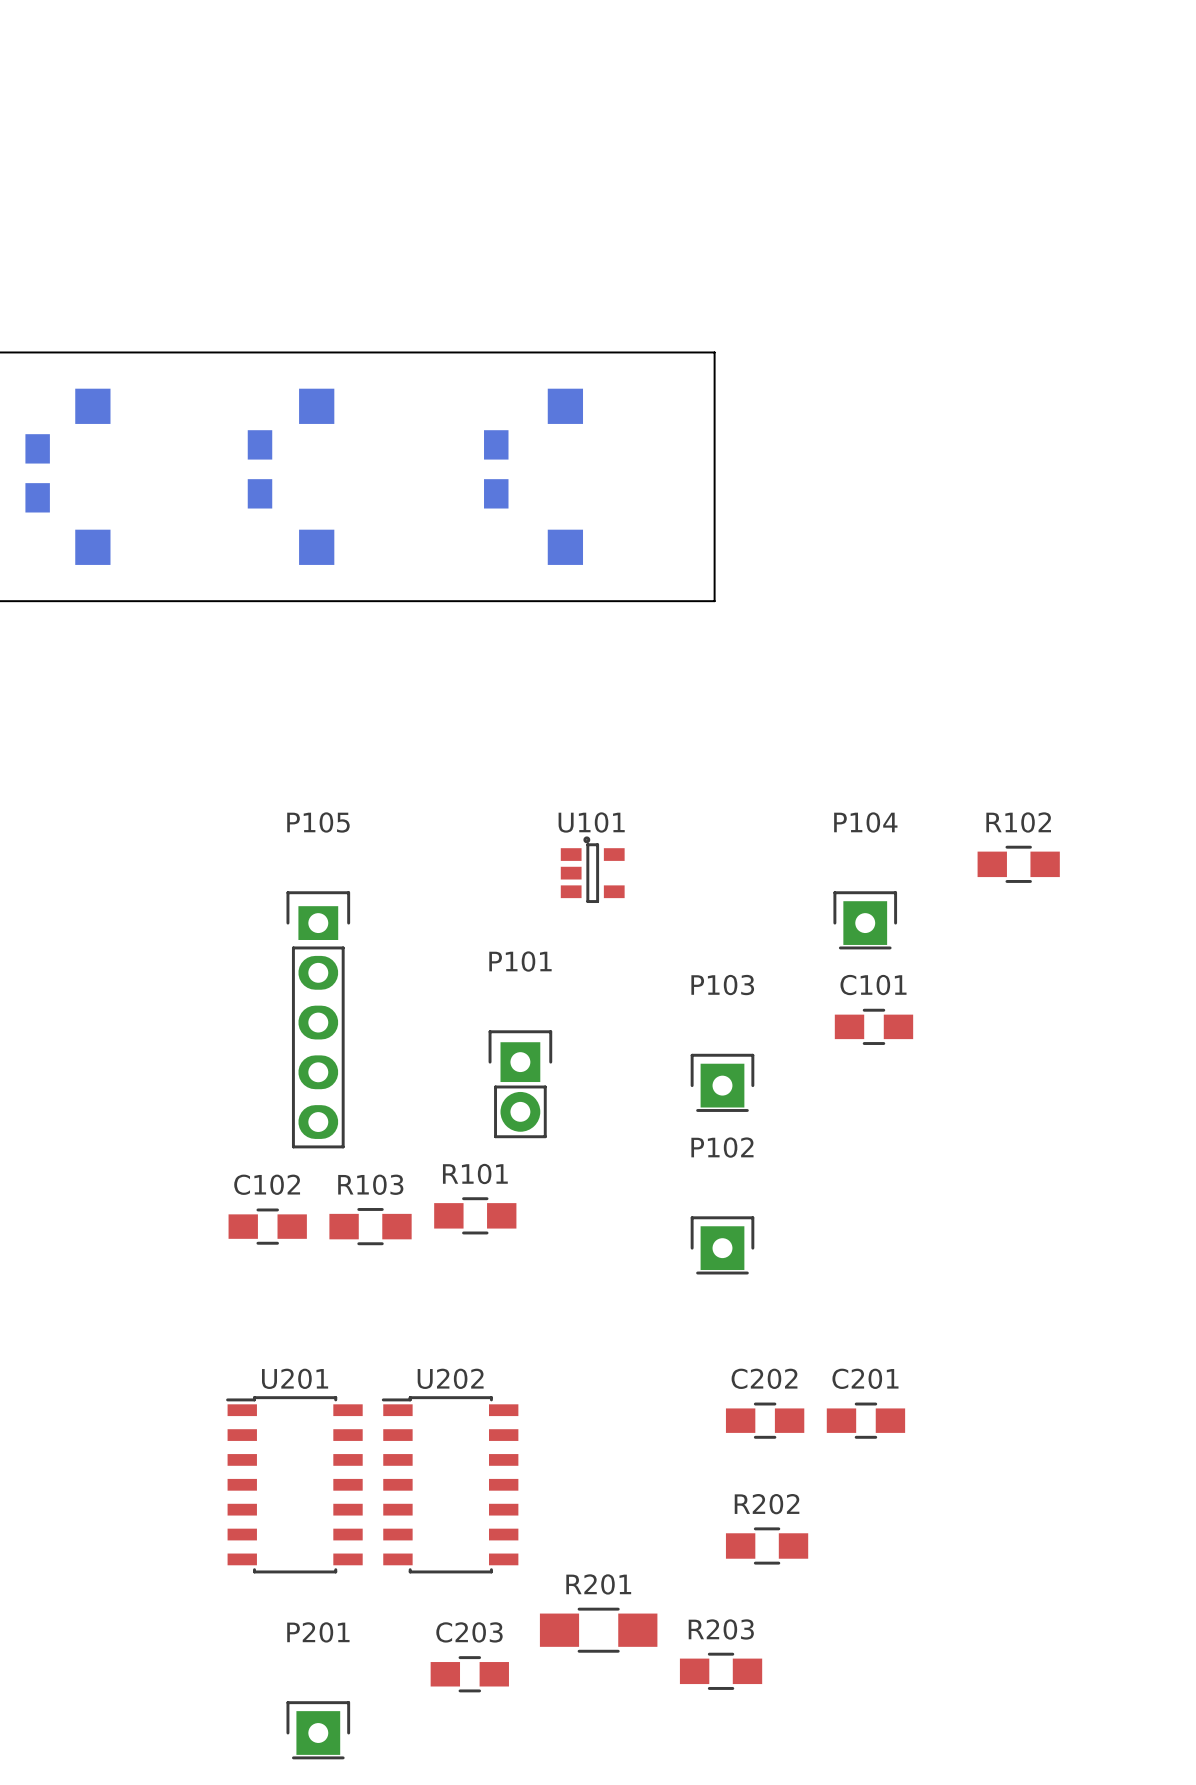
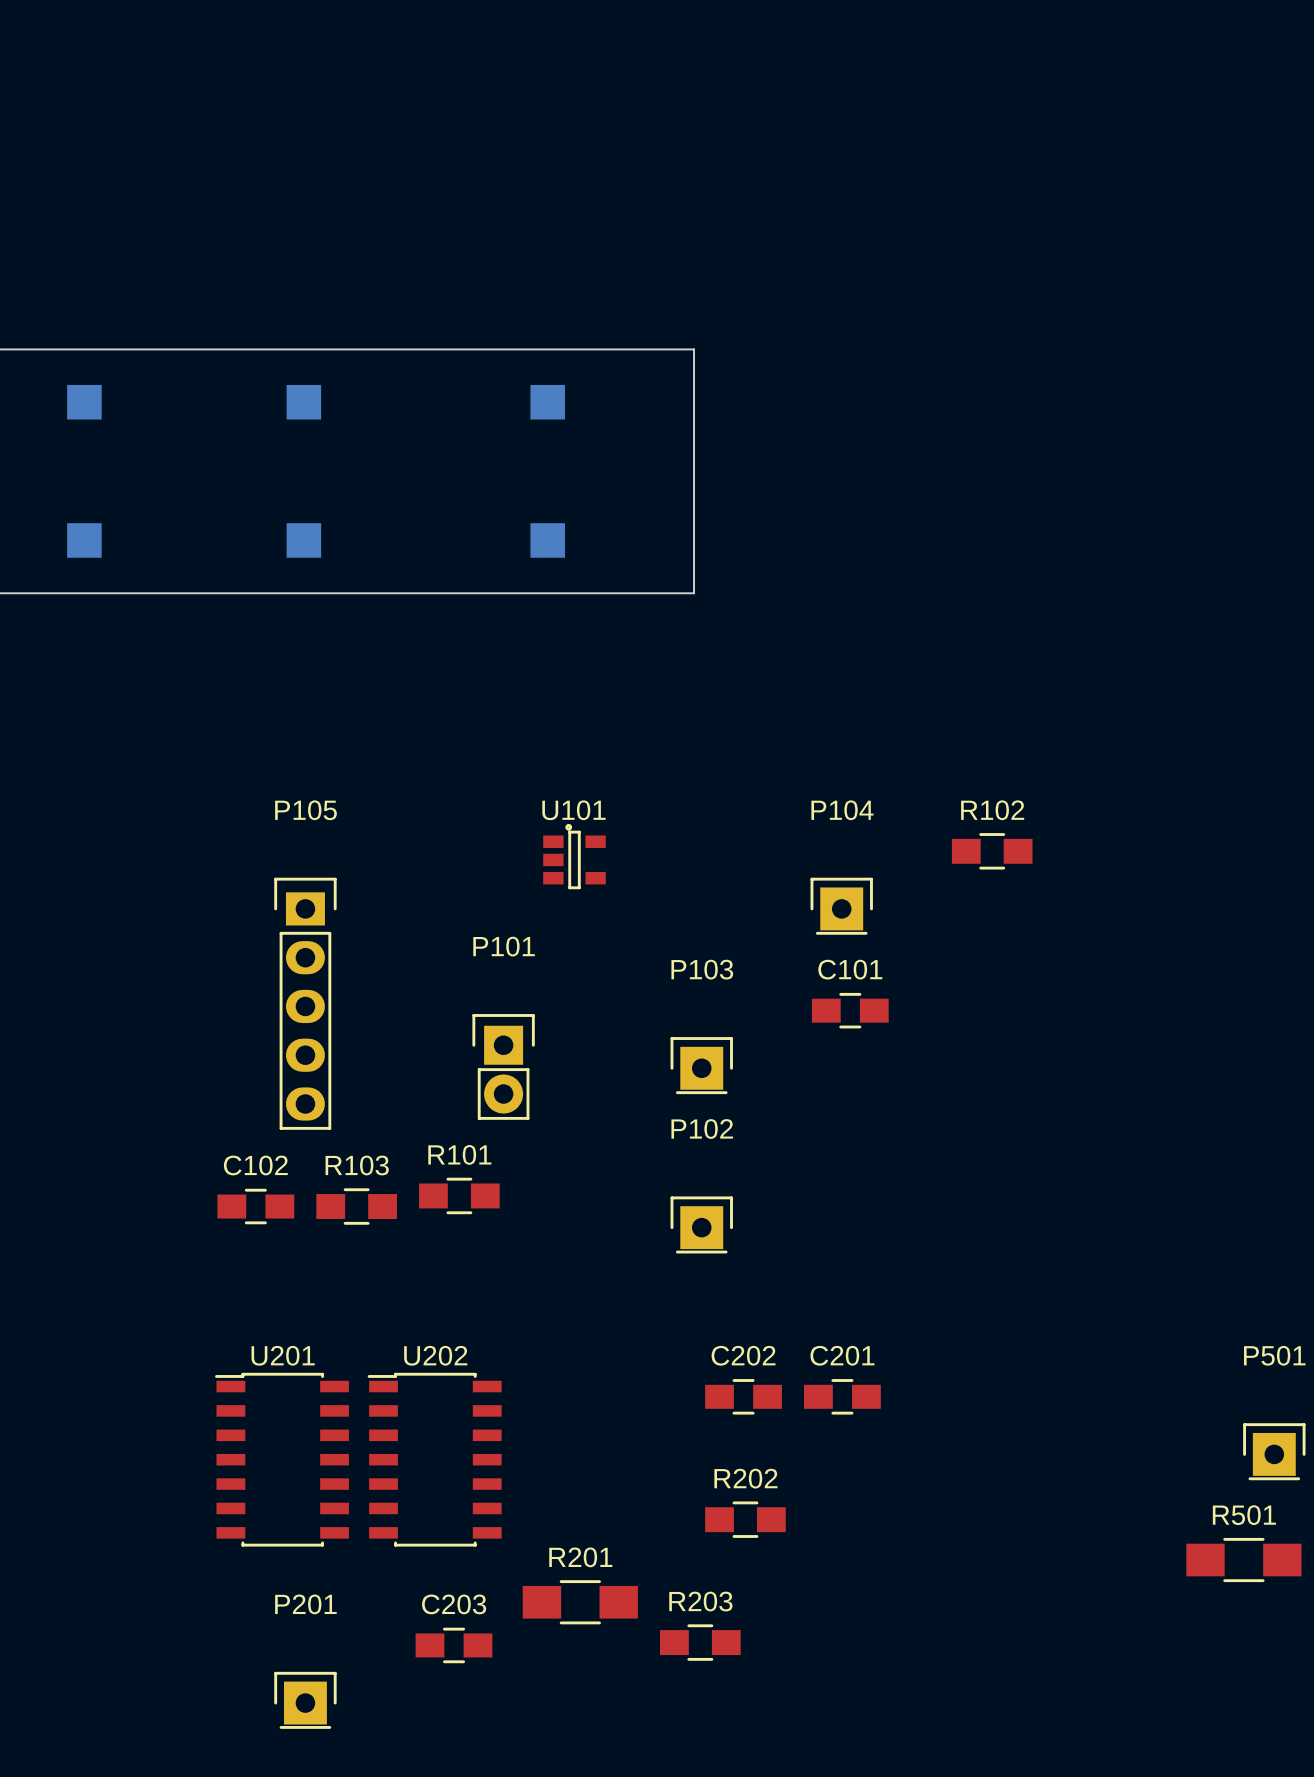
part: (259, 469) -> none
part: (496, 469) -> none
part: (37, 473) -> none

